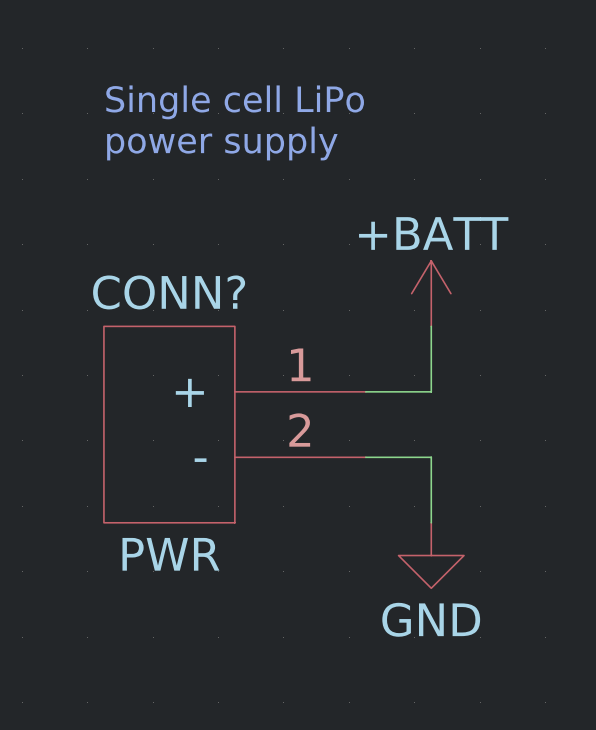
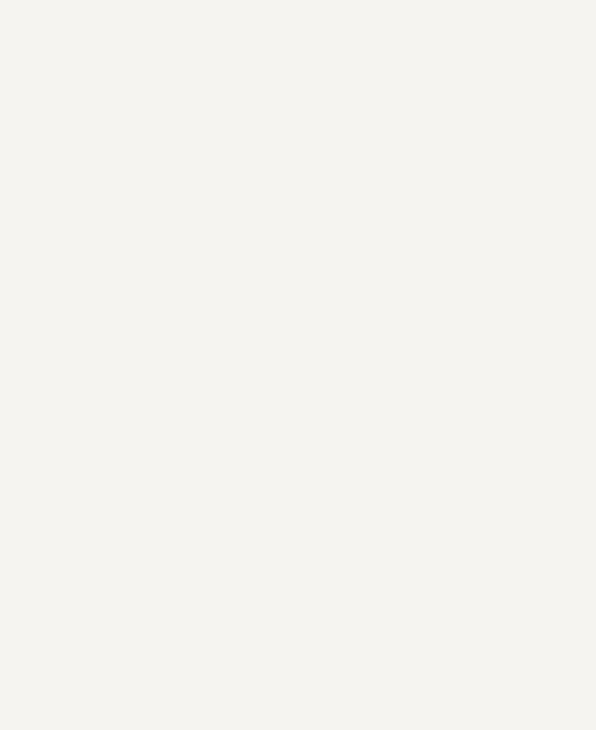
text: Single cell LiPo (235, 102) -> none
text: power supply (222, 143) -> none
power symbol: +BATT (431, 293) -> none
wire: (431, 326) (431, 391) (365, 391) -> none
CONN?: PWR (234, 424) -> none
wire: (365, 457) (431, 457) (431, 522) -> none
power symbol: GND (431, 555) -> none

